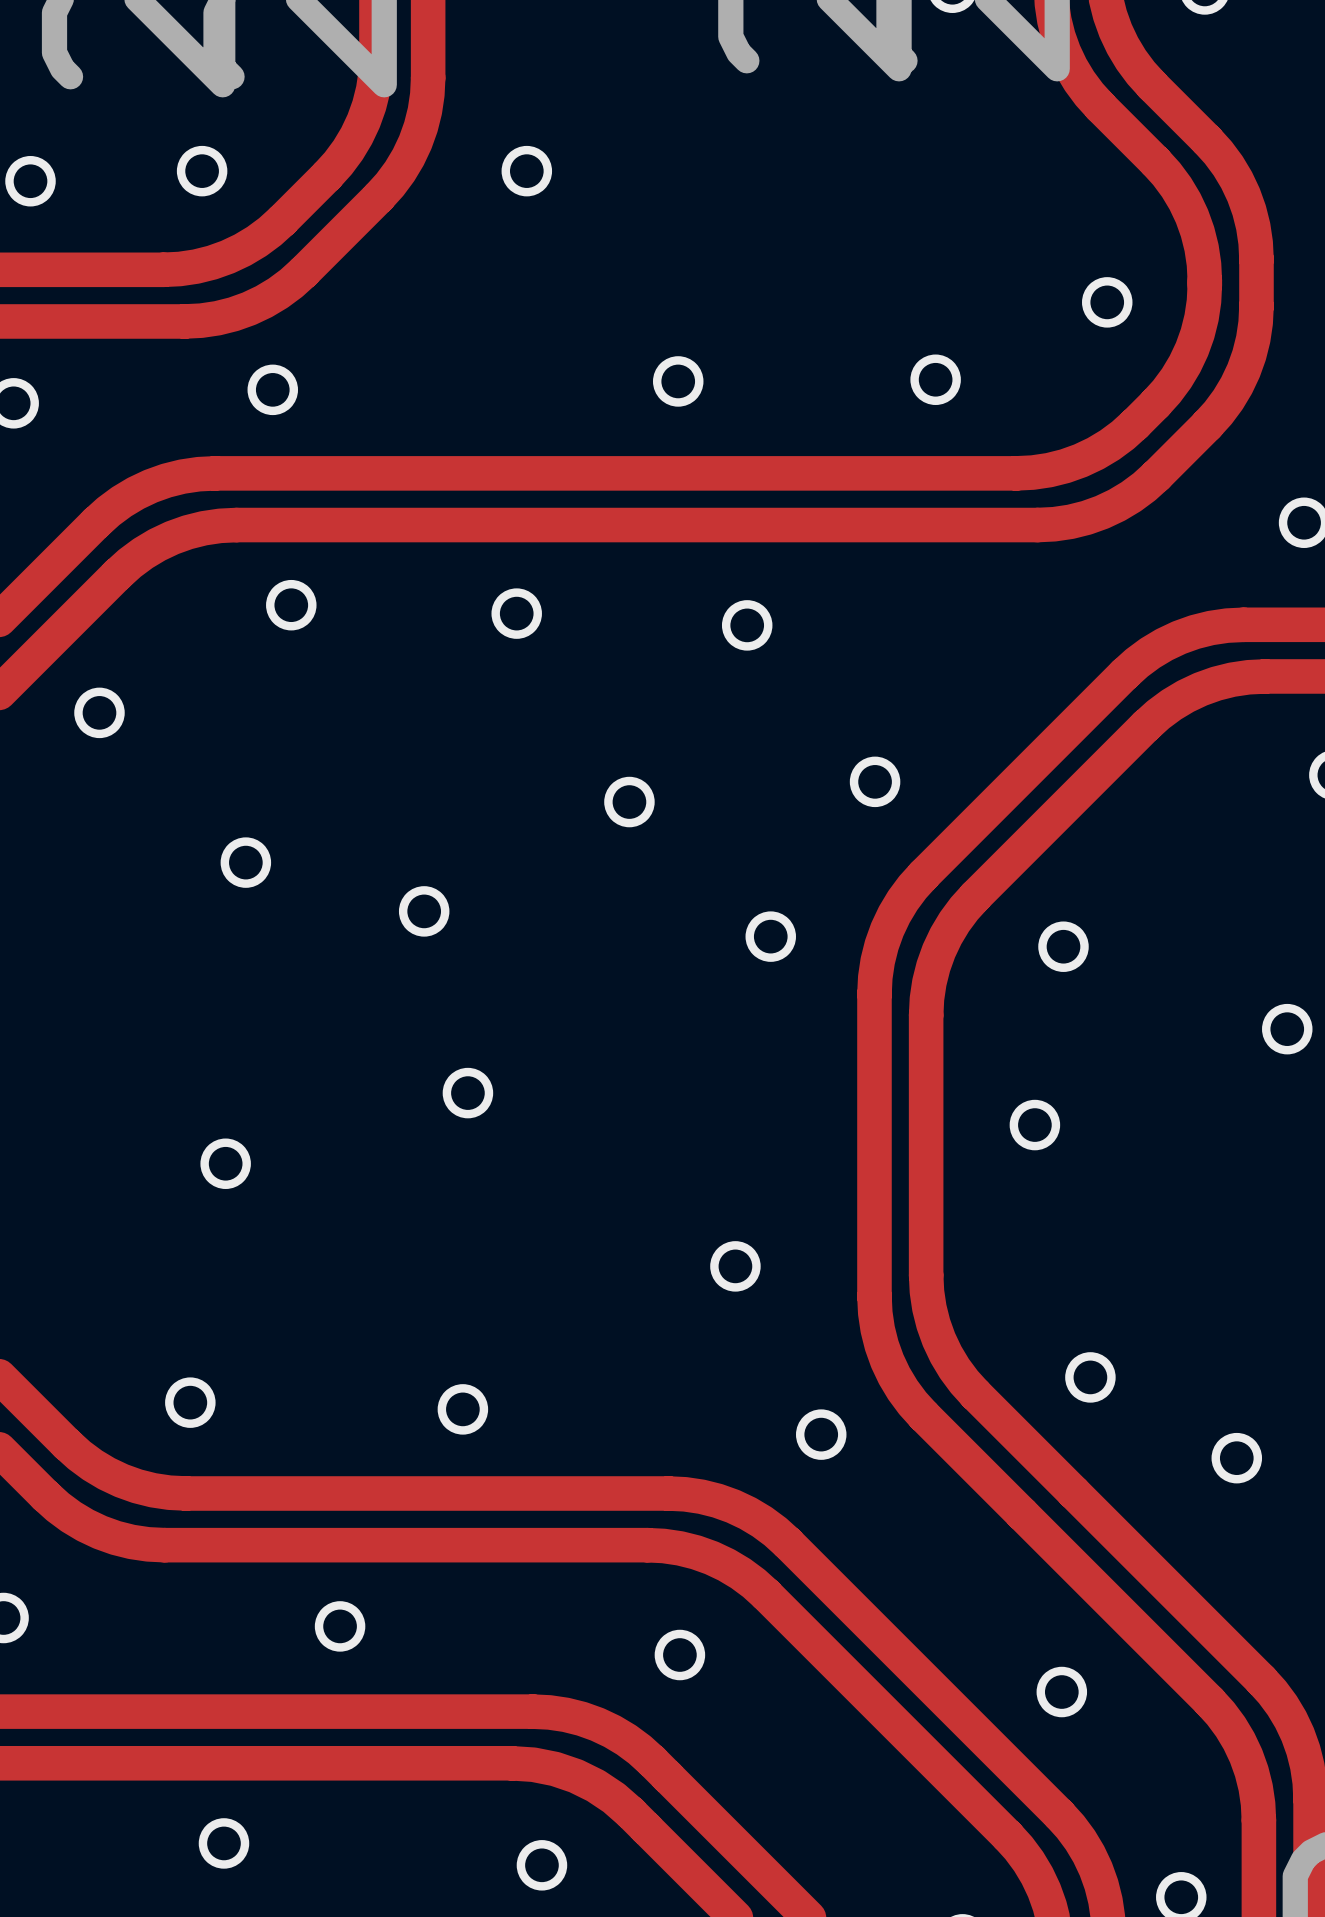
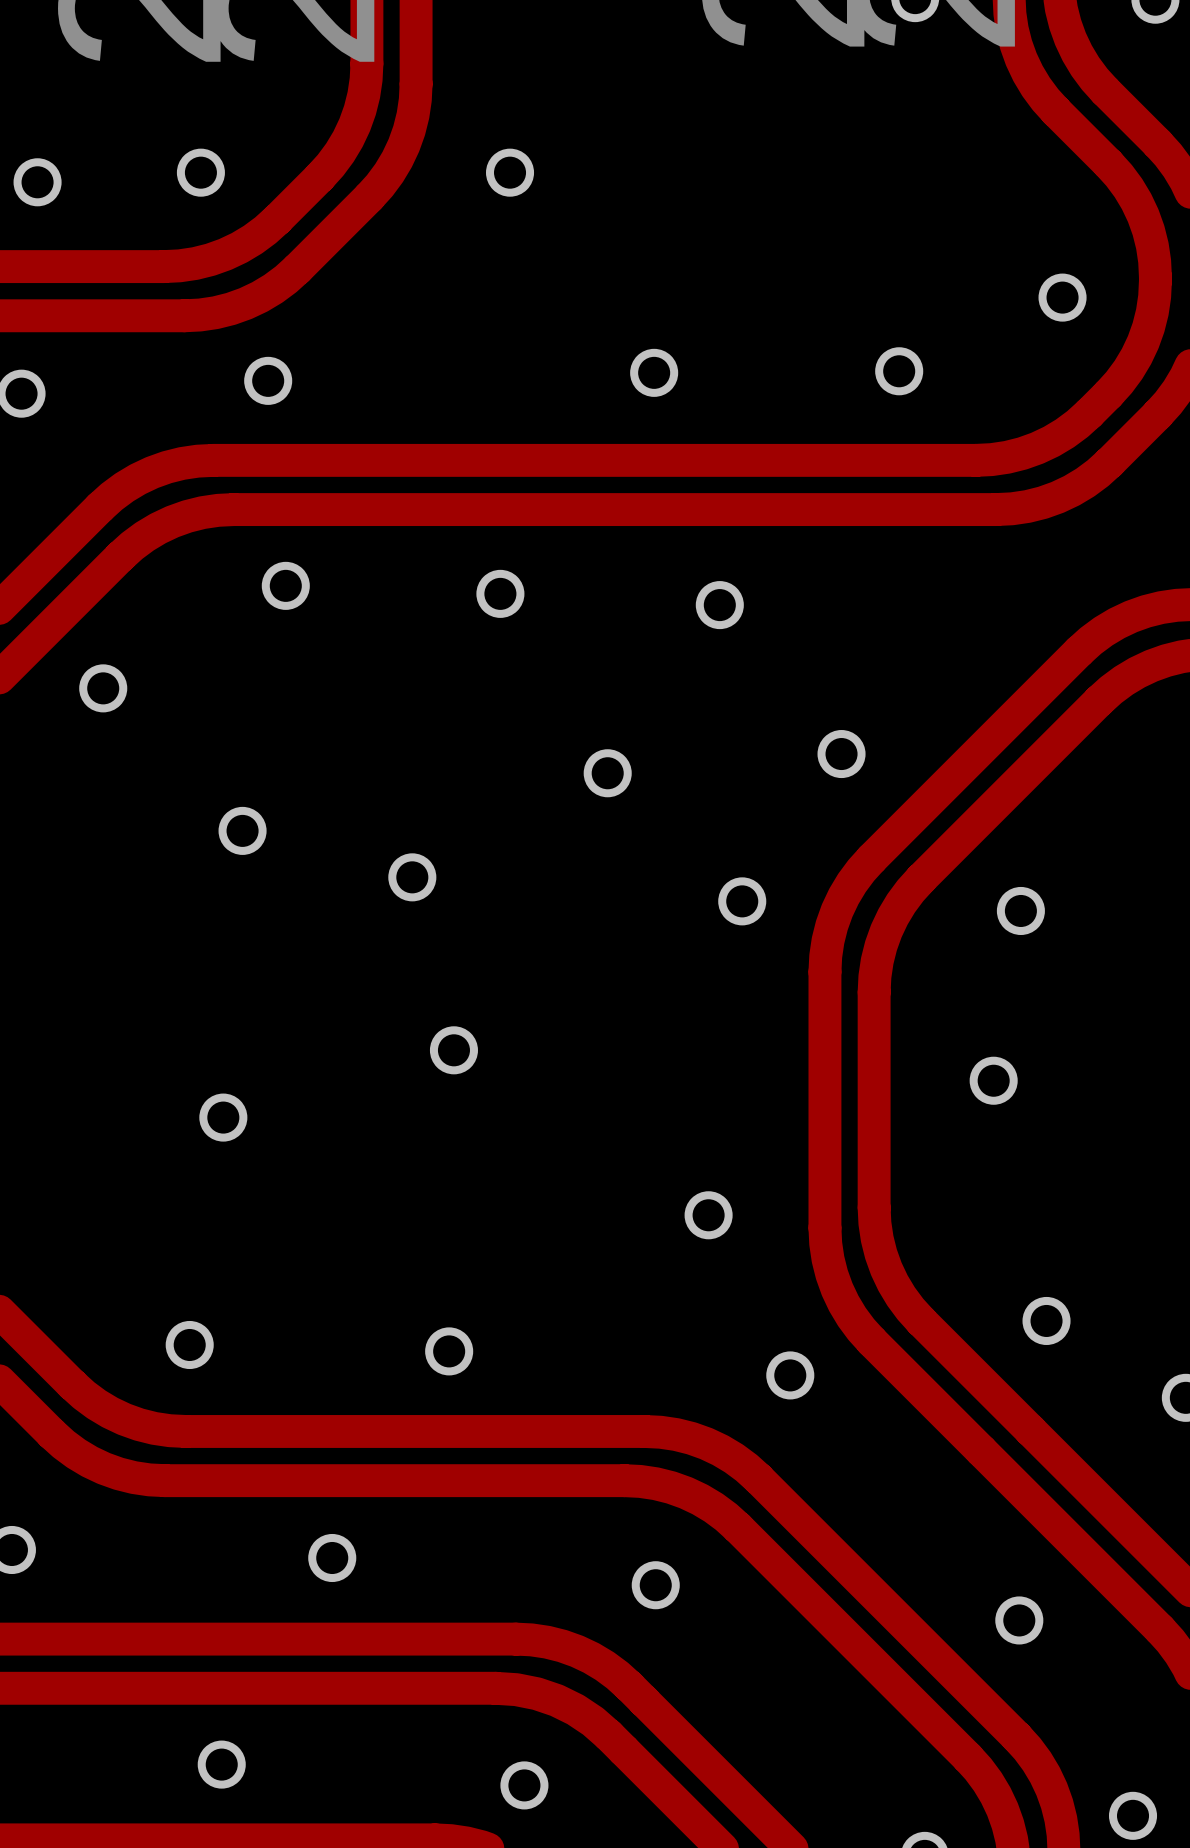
track: (923, 874) (902, 900) (887, 929) (877, 961) (874, 993) (875, 1313) (881, 1345) (894, 1375) (902, 1390) (923, 1415) -> (887, 842) (861, 870) (843, 896) (831, 925) (825, 956) (824, 971) (824, 1227) (828, 1259) (837, 1289) (851, 1316) (887, 1357)
track: (975, 896) (954, 921) (938, 950) (929, 982) (926, 1015) (926, 1291) (929, 1307) (938, 1339) (954, 1368) (975, 1394) -> (937, 863) (910, 890) (893, 916) (881, 945) (877, 961) (874, 992) (874, 1207) (877, 1238) (886, 1268) (901, 1296) (937, 1336)

